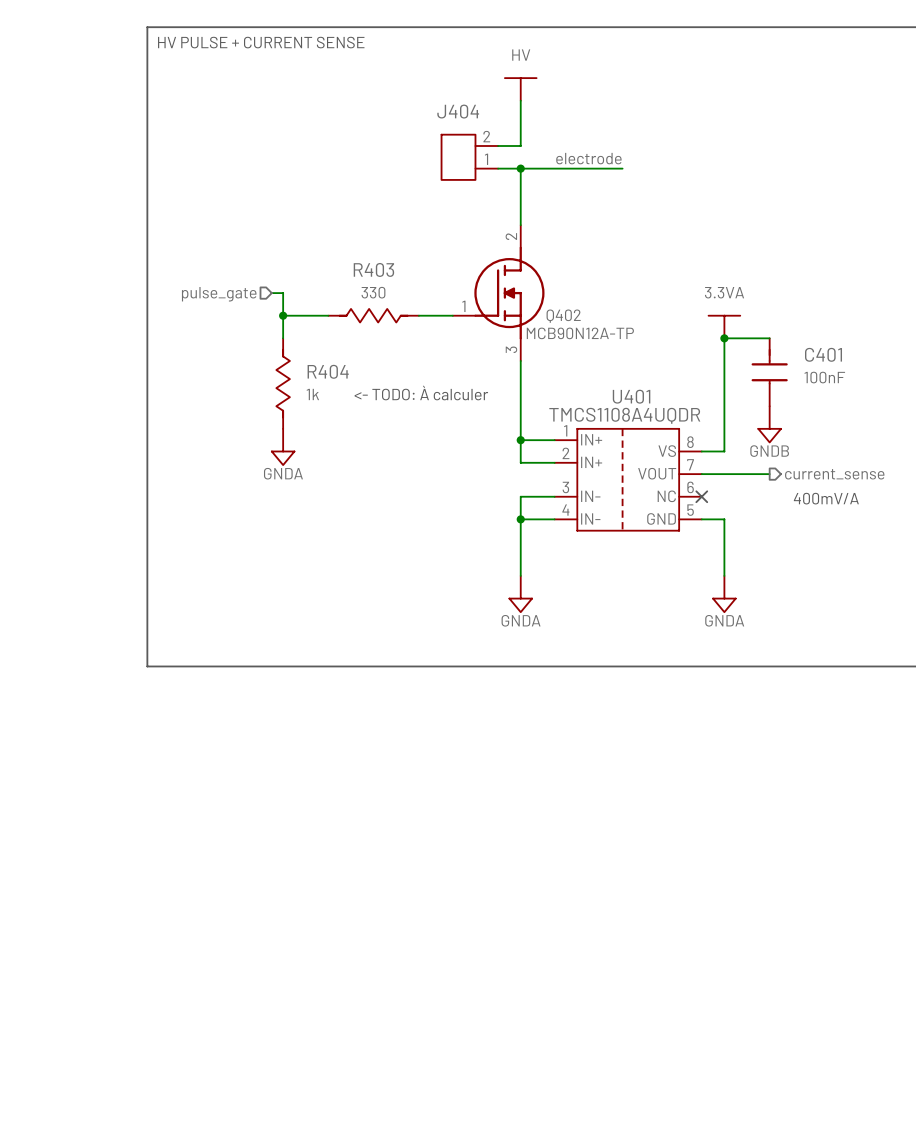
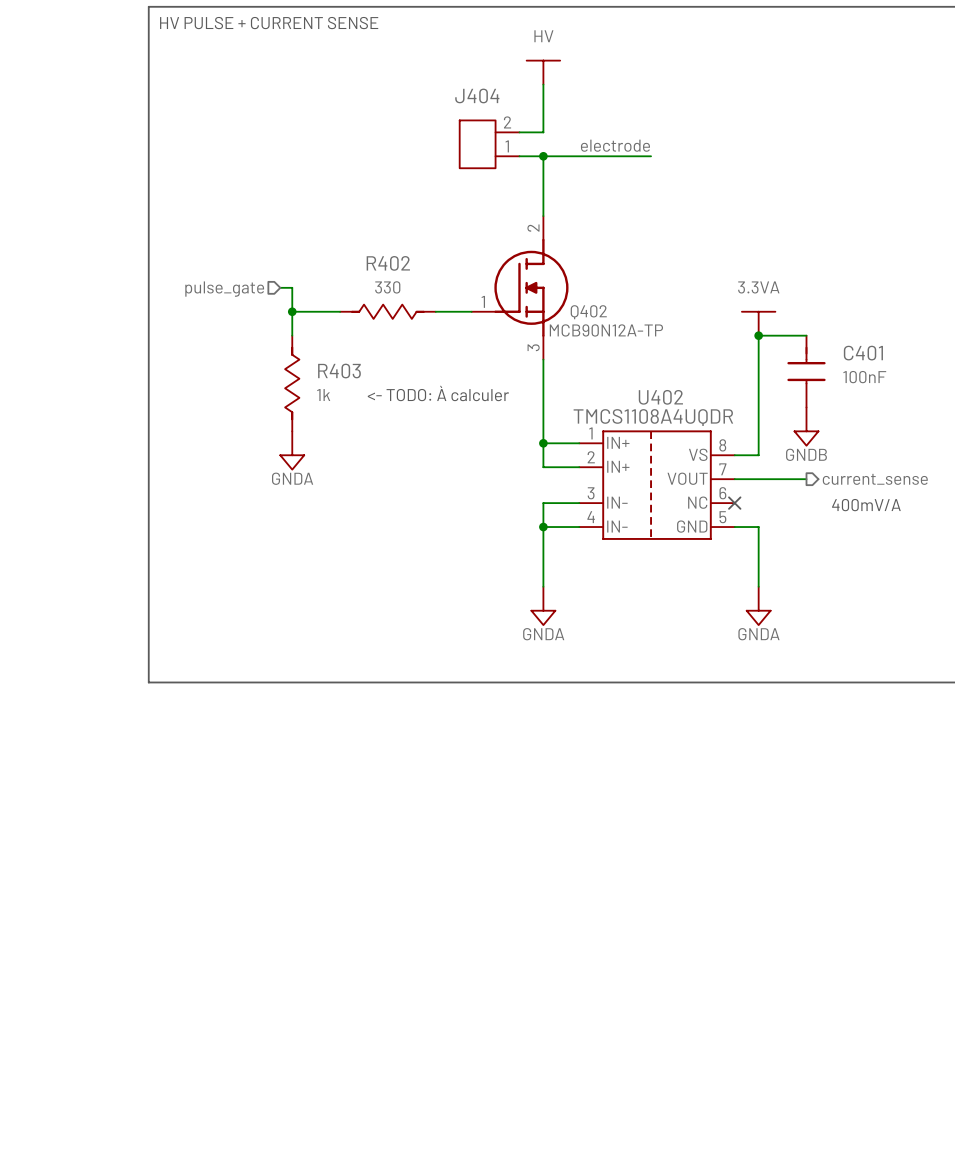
R403 name: R403 (373, 269) -> R402 (388, 263)
R404 name: R404 (328, 371) -> R403 (339, 371)
U401 name: U401 (631, 396) -> U402 (660, 397)

